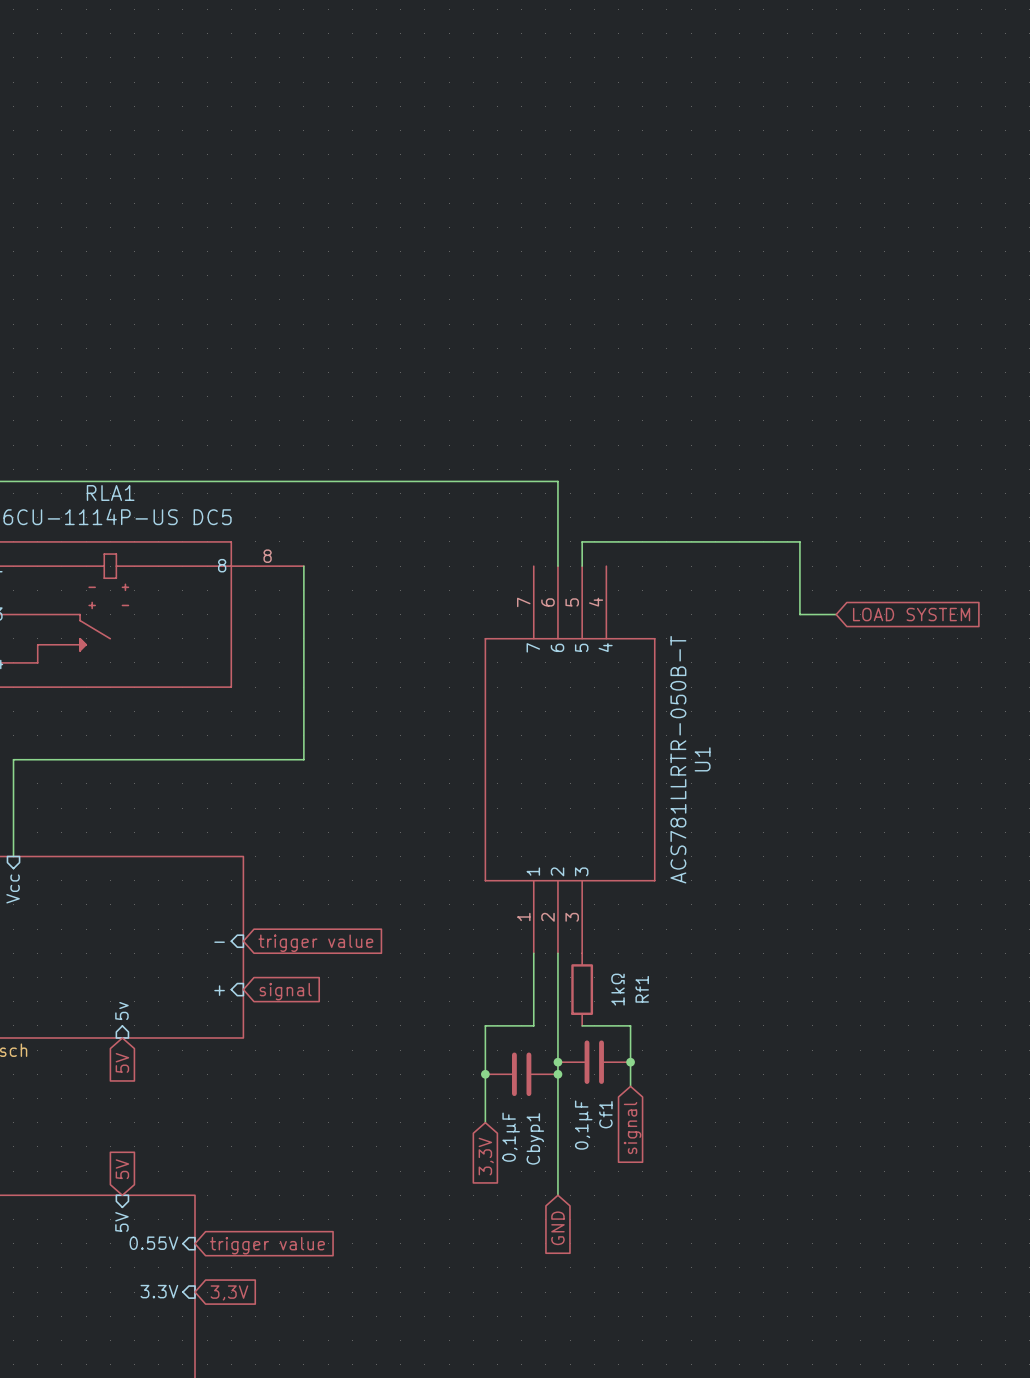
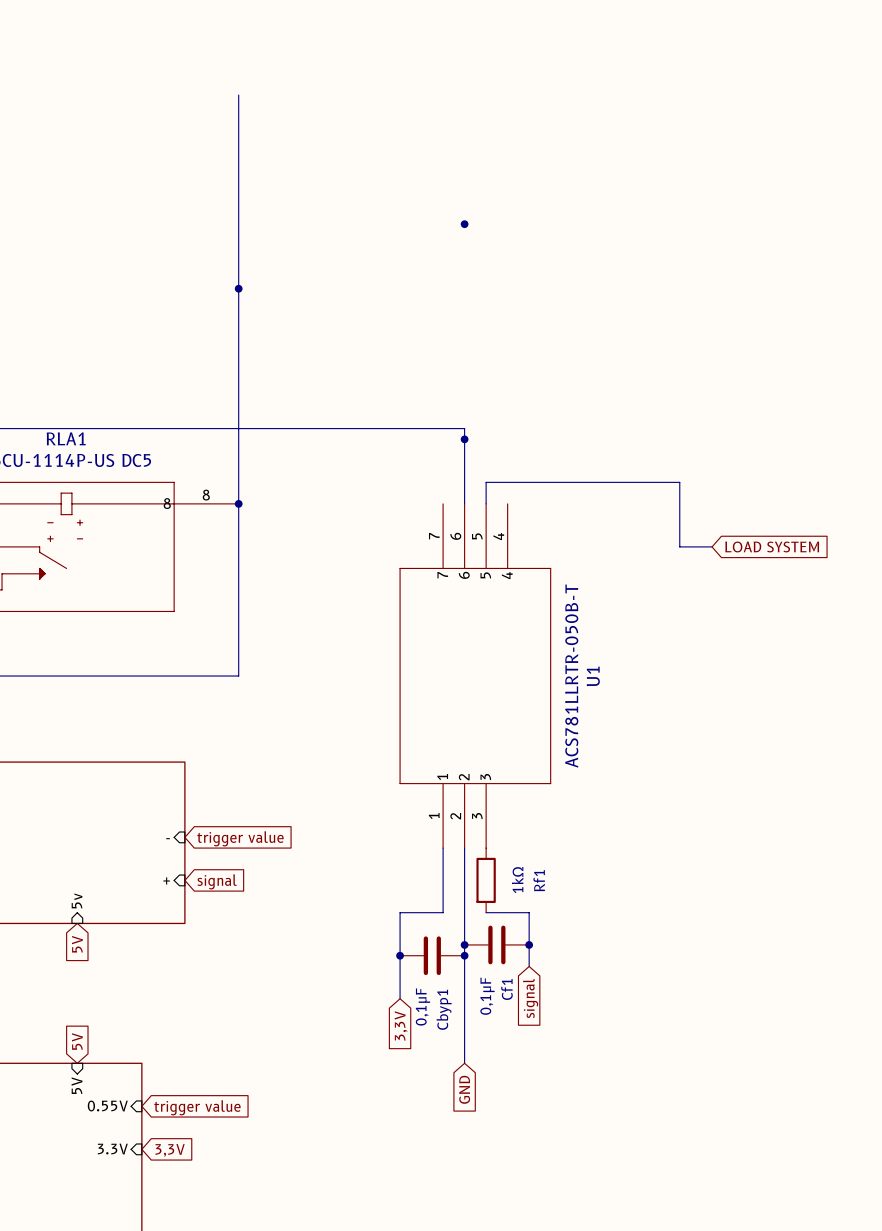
wire: none -> (238, 95) (238, 503)
junction: none -> (464, 224)
junction: none -> (238, 288)
junction: none -> (464, 439)
junction: none -> (238, 503)

